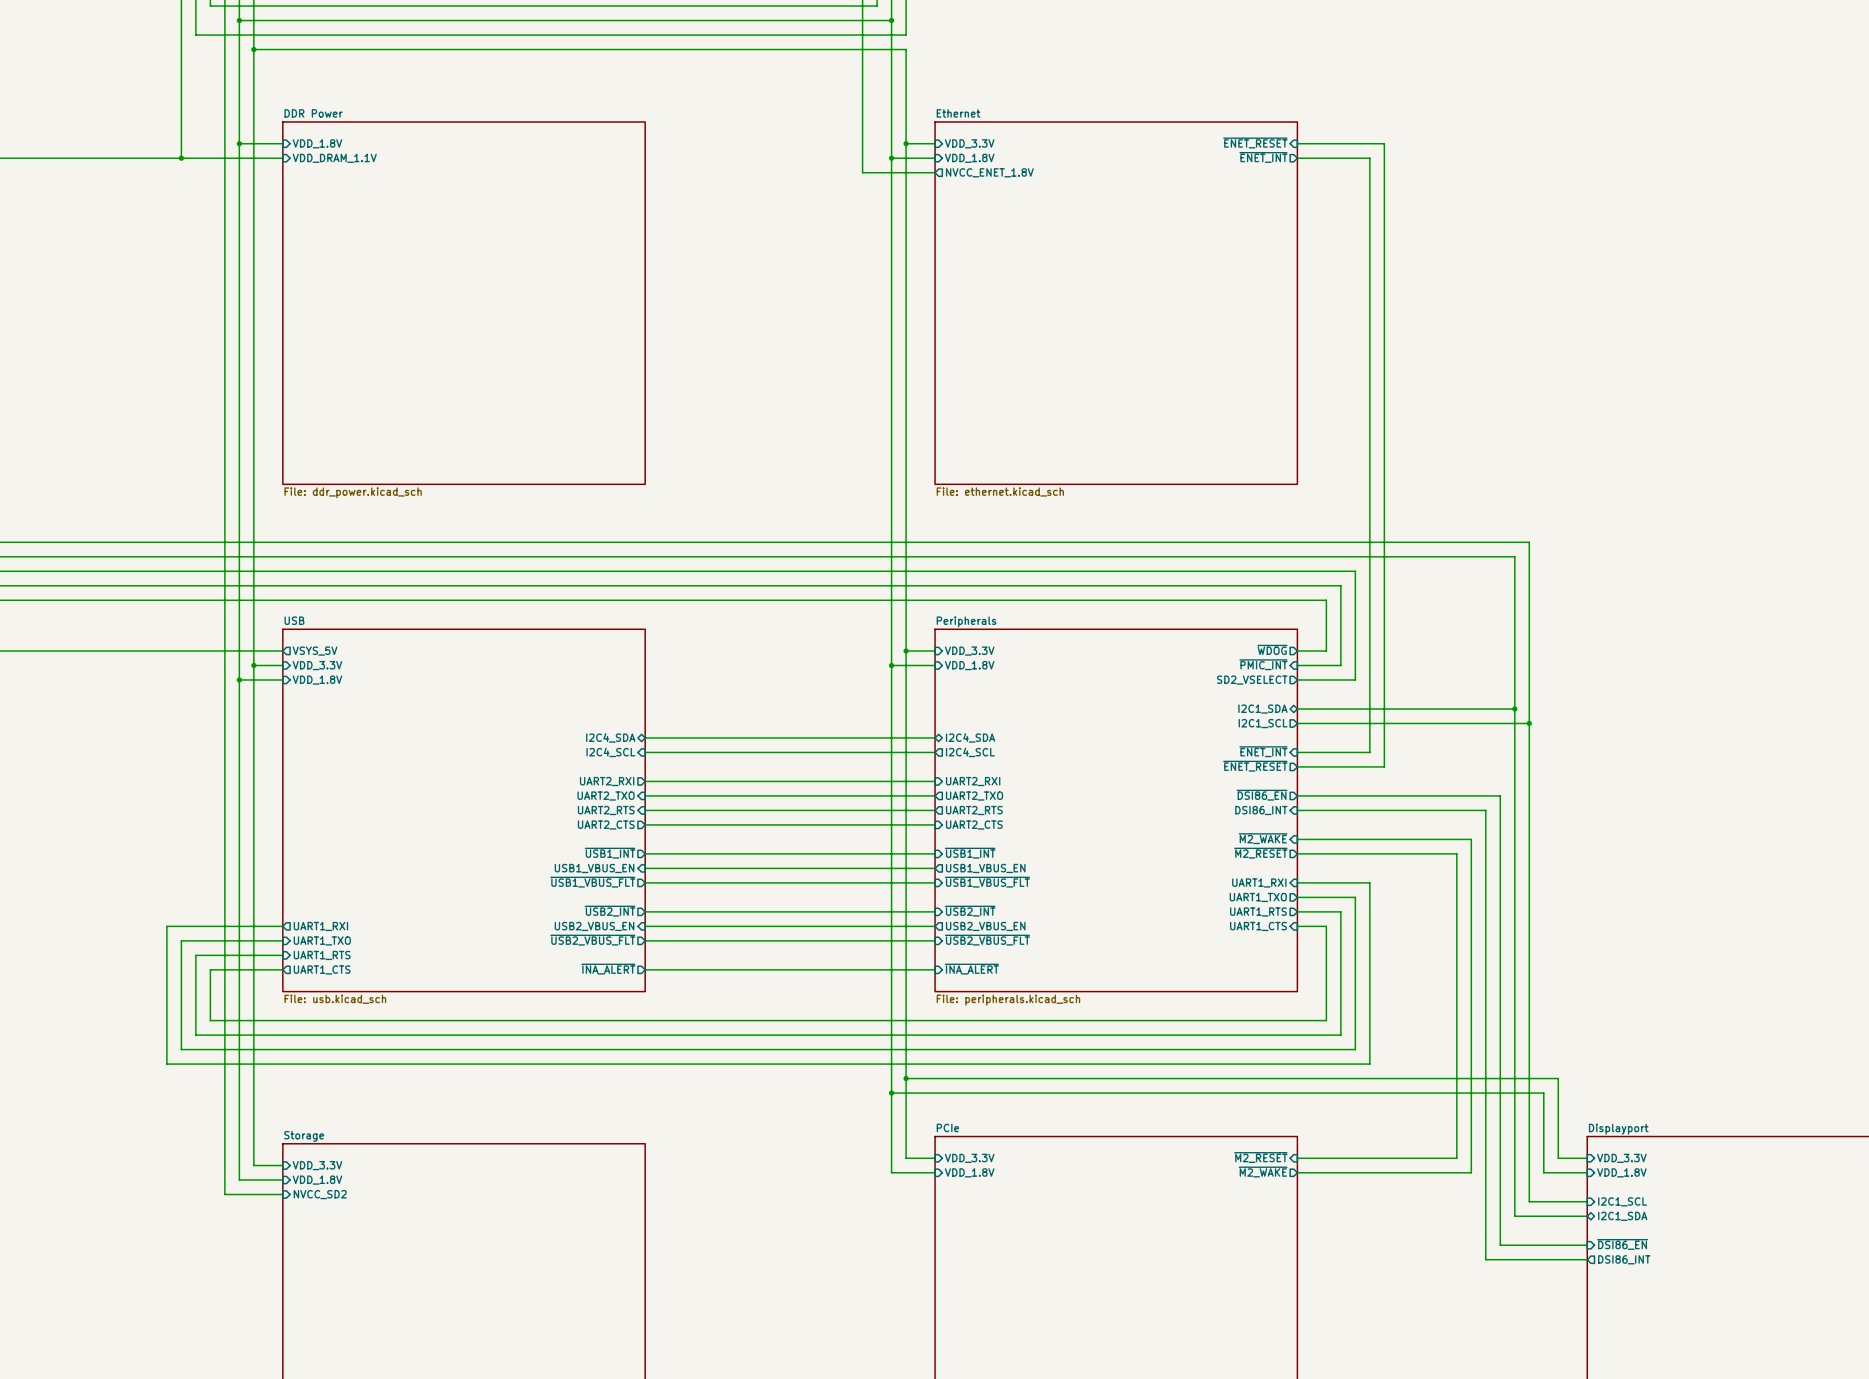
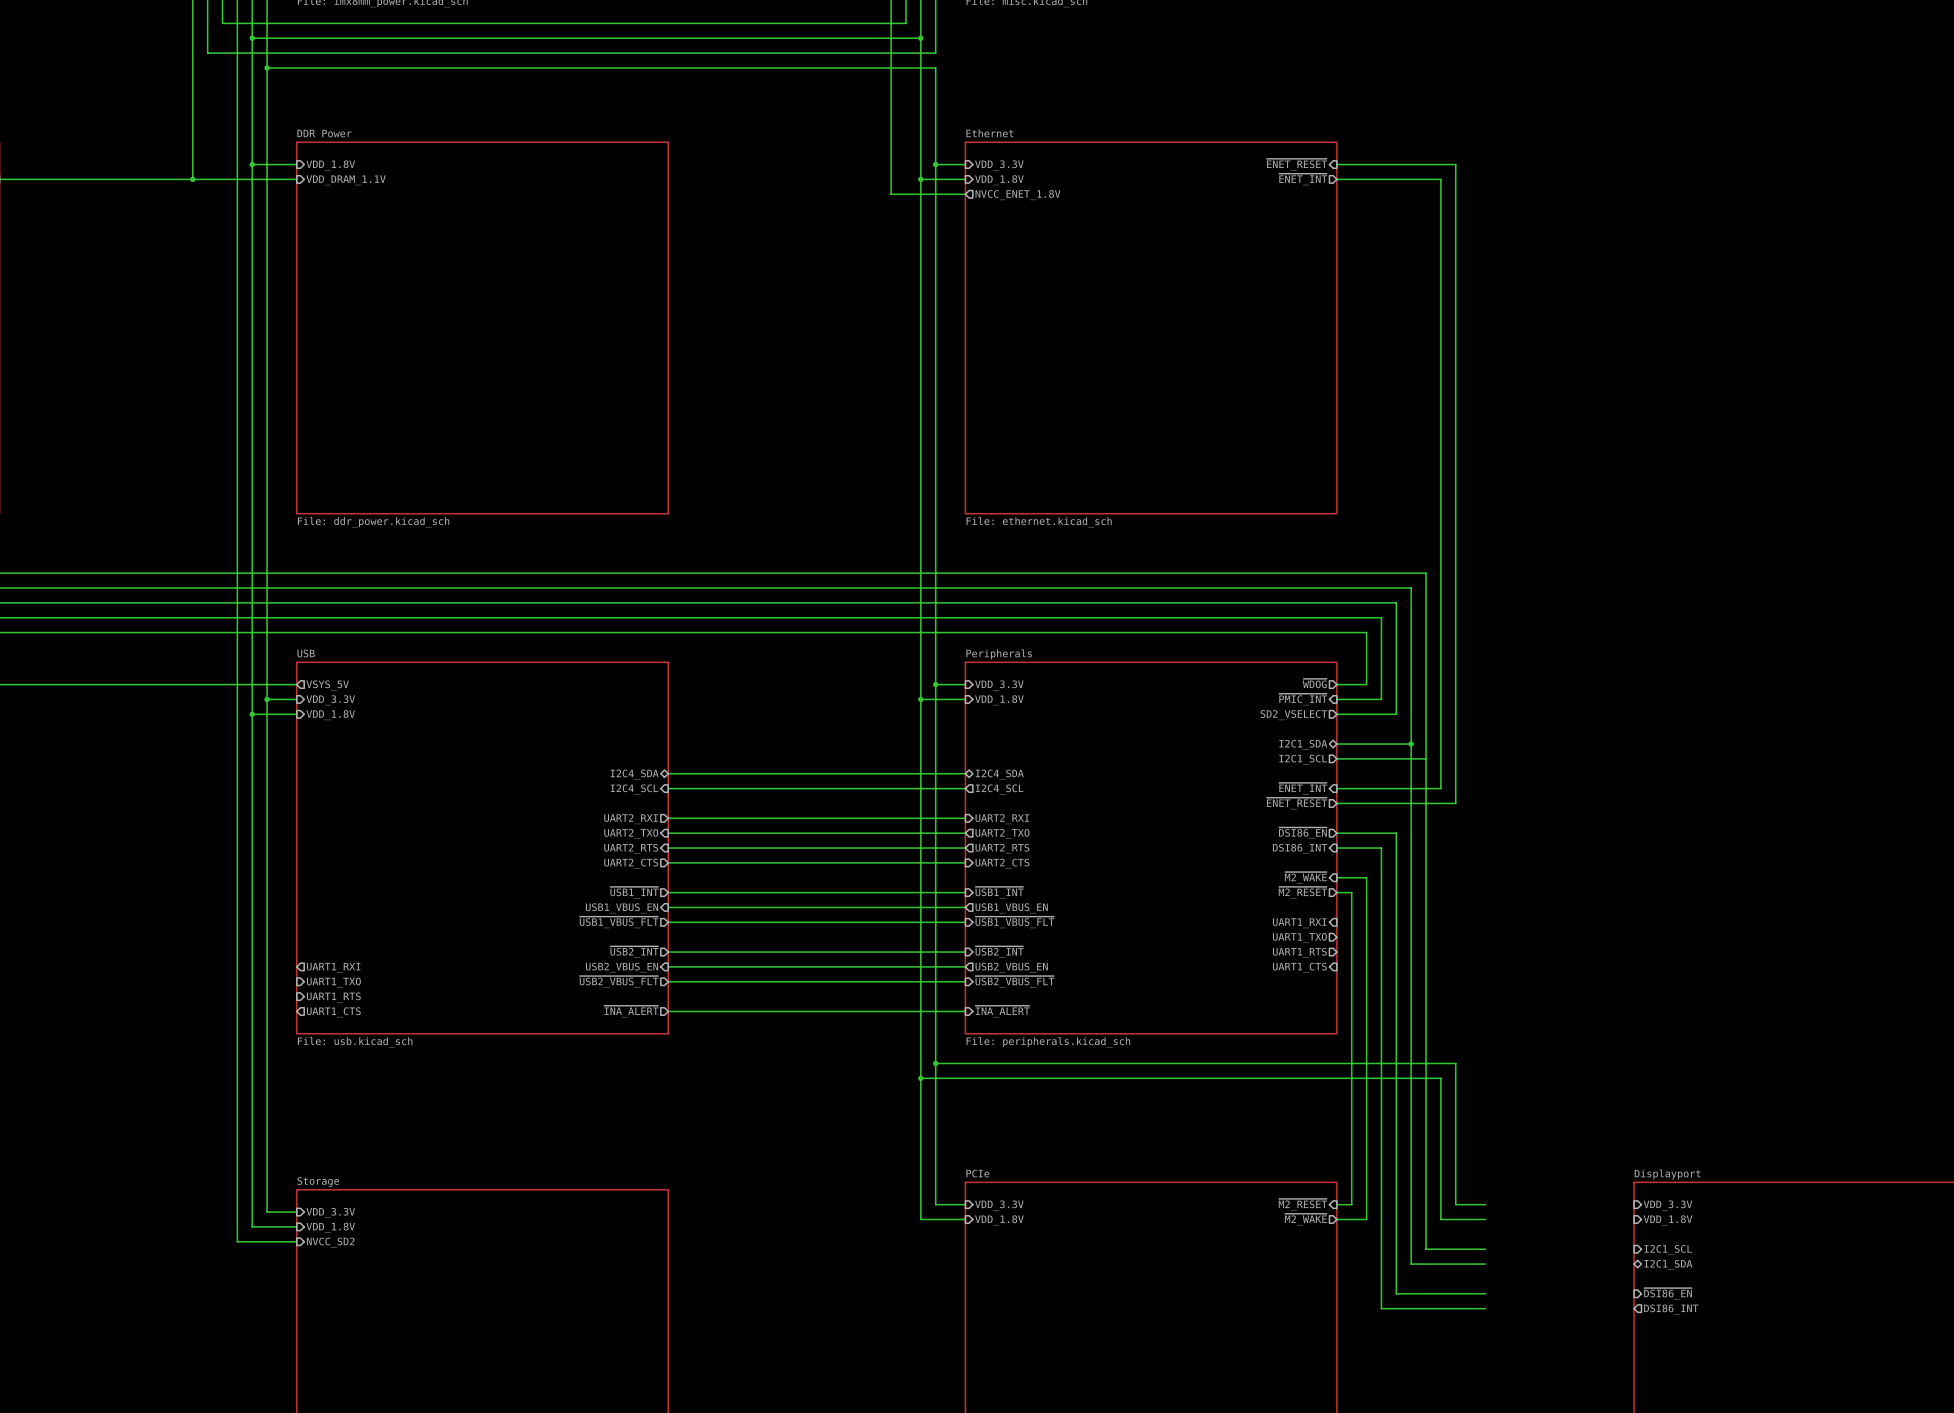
wire: (1384, 143) (1384, 542) (1529, 542) (1529, 1201) (1587, 1201) -> (1426, 164) (1455, 164) (1455, 803) (1426, 803) (1426, 1249) (1485, 1249)
wire: (1369, 158) (1369, 556) (1514, 556) (1514, 1216) (1587, 1216) -> (1411, 179) (1440, 179) (1440, 788) (1411, 788) (1411, 922)
wire: (1369, 708) (1514, 708) -> none
junction: none -> (1411, 744)
junction: (1514, 708) -> none
wire: (1384, 723) (1529, 723) -> none
junction: (1529, 723) -> none
wire: (1355, 795) (1500, 795) (1500, 1245) (1587, 1245) -> none
wire: (1340, 810) (1485, 810) (1485, 1259) (1587, 1259) -> none
wire: (1326, 839) (1471, 839) (1471, 1172) (1442, 1172) -> none
wire: (1311, 853) (1456, 853) (1456, 1158) (1442, 1158) -> (1351, 892) (1351, 1204)
wire: (1297, 882) (1369, 882) -> none
wire: (1297, 897) (1355, 897) -> (1396, 833) (1396, 937)
wire: (1297, 911) (1340, 911) -> (1381, 848) (1381, 952)
wire: (282, 926) (166, 926) (166, 1064) (1369, 1064) -> (1485, 1264) (1411, 1264) (1411, 1108)
wire: (1297, 926) (1326, 926) -> (1366, 877) (1366, 966)
wire: (282, 940) (181, 940) (181, 1049) (1355, 1049) -> (1485, 1293) (1396, 1293) (1396, 1093)
wire: (282, 955) (195, 955) (195, 1035) (891, 1035) -> none
wire: (282, 969) (210, 969) (210, 1020) (906, 1020) -> none
junction: none -> (935, 1063)
junction: none -> (920, 1078)
wire: (906, 1078) (1558, 1078) (1558, 1158) (1587, 1158) -> none
junction: (906, 1078) -> none
wire: (891, 1093) (1543, 1093) (1543, 1172) (1587, 1172) -> none
junction: (891, 1093) -> none
wire: (1311, 1158) (1413, 1158) -> (1366, 1219) (1366, 1063) (1455, 1063) (1455, 1204)
wire: (1326, 1172) (1398, 1172) -> (1485, 1308) (1381, 1308) (1381, 1078) (1440, 1078) (1440, 1219)

